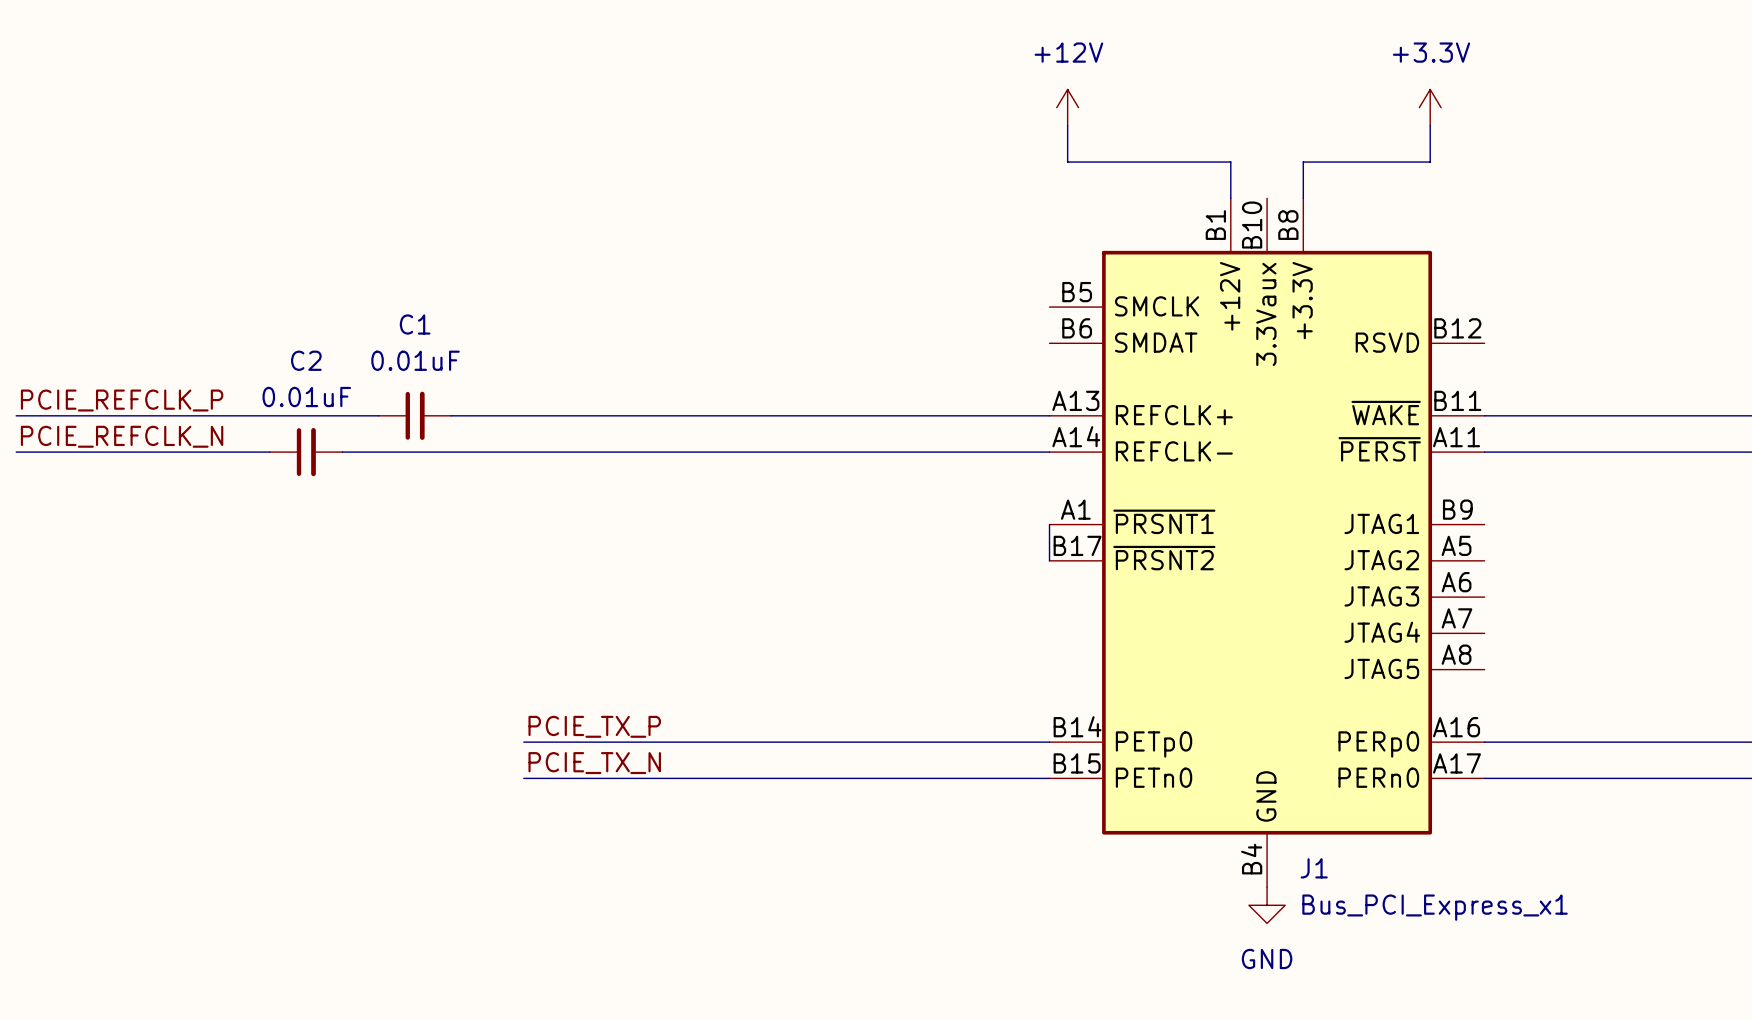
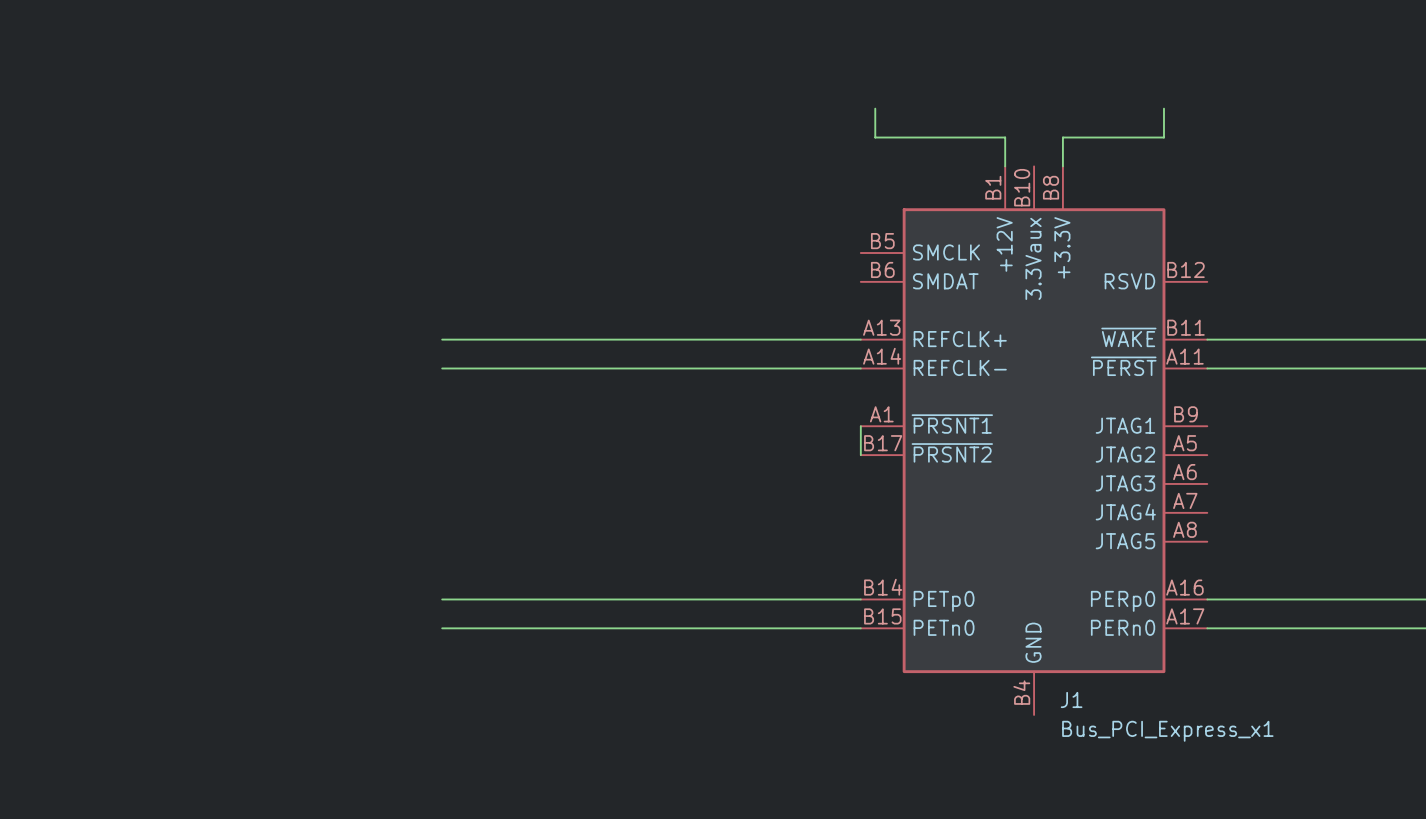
power symbol: +12V (1067, 107) -> none
power symbol: +3.3V (1430, 107) -> none
label: PCIE_REFCLK_P (122, 400) -> none
wire: (16, 415) (378, 415) -> none
C1: 0.01uF (415, 415) -> none
wire: (451, 415) (523, 415) -> none
label: PCIE_REFCLK_N (122, 436) -> none
wire: (16, 452) (270, 452) -> none
C2: 0.01uF (306, 452) -> none
wire: (342, 452) (523, 452) -> none
label: PCIE_TX_P (594, 726) -> none
label: PCIE_TX_N (594, 763) -> none
power symbol: GND (1267, 905) -> none

